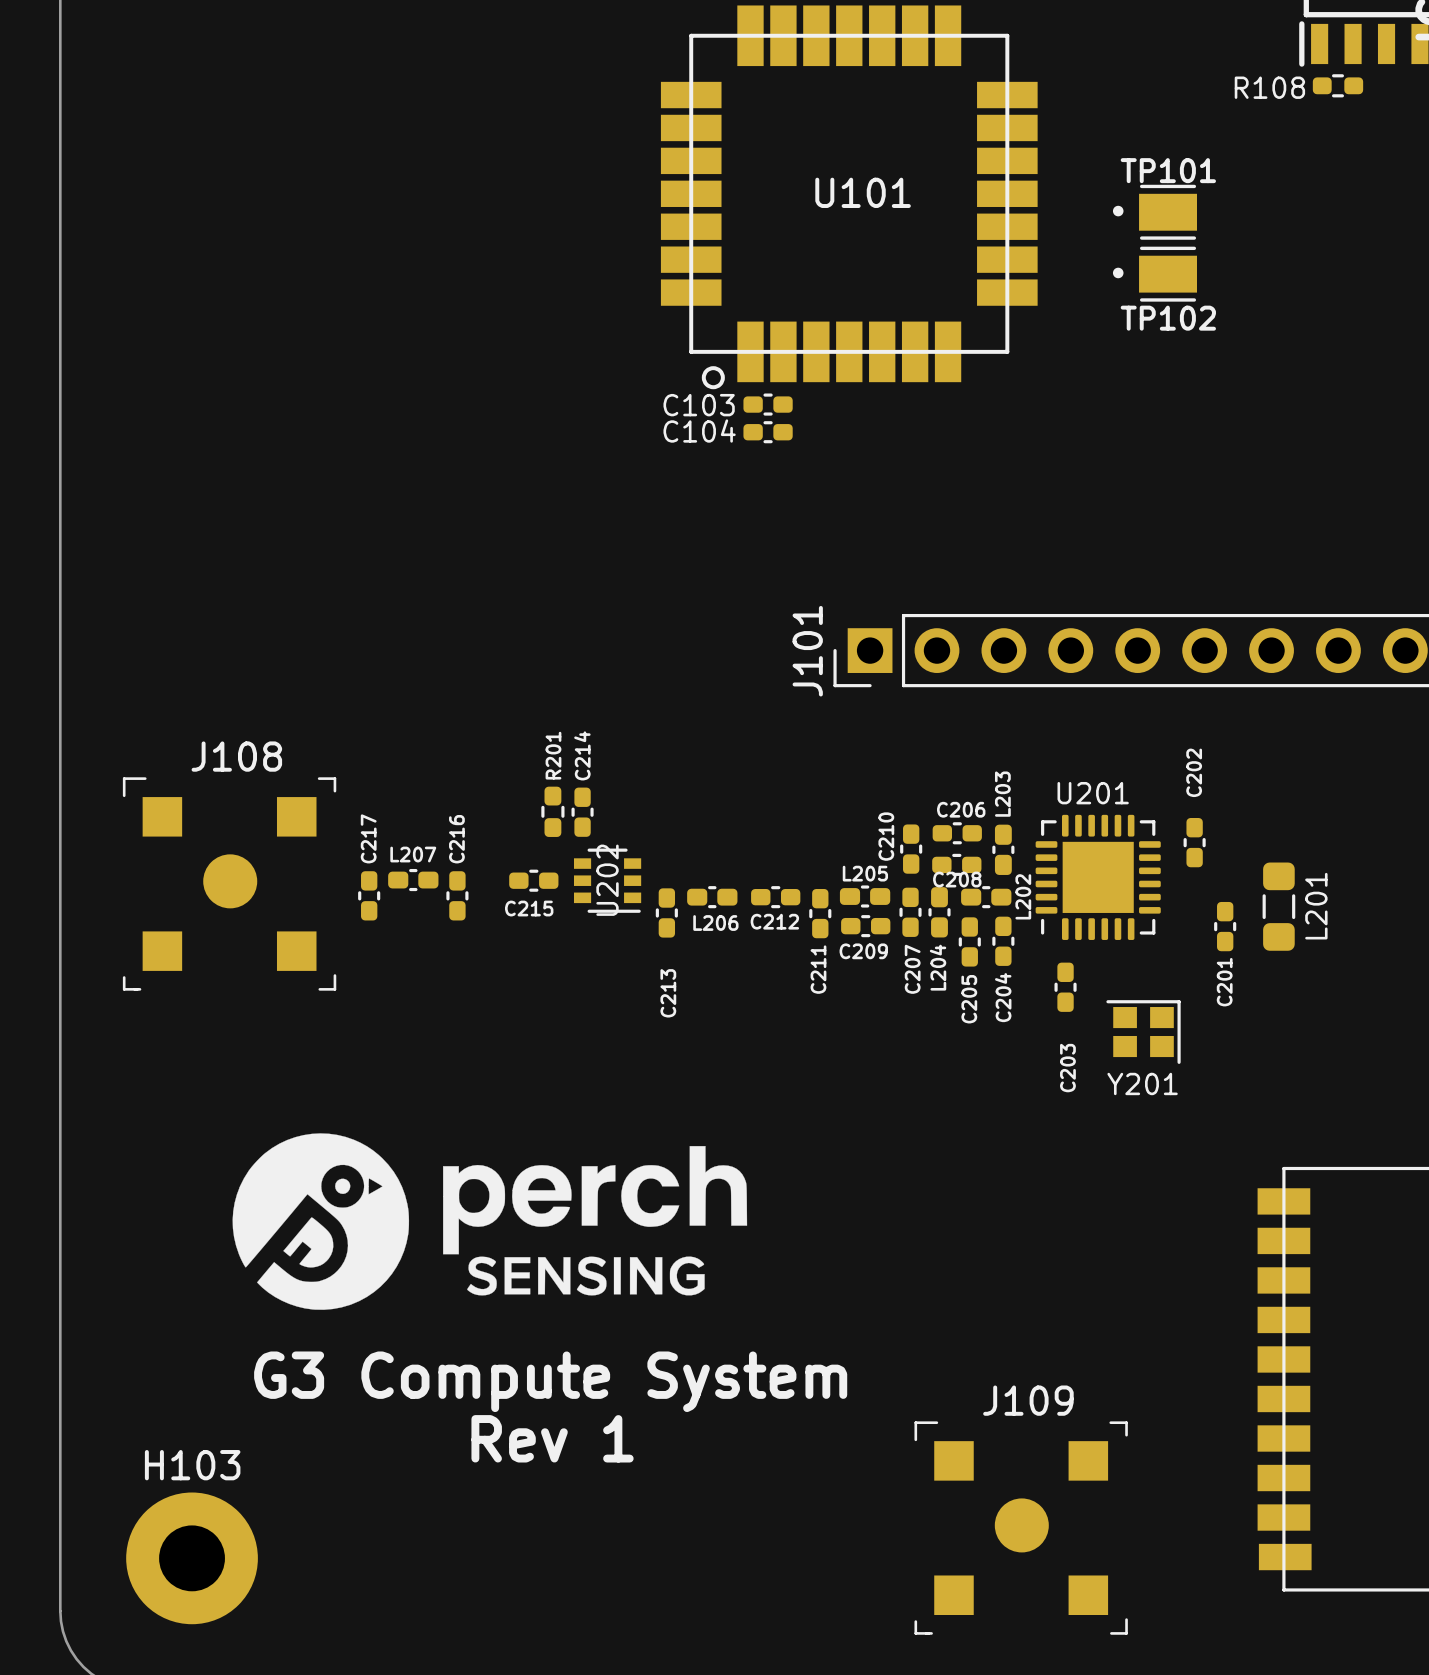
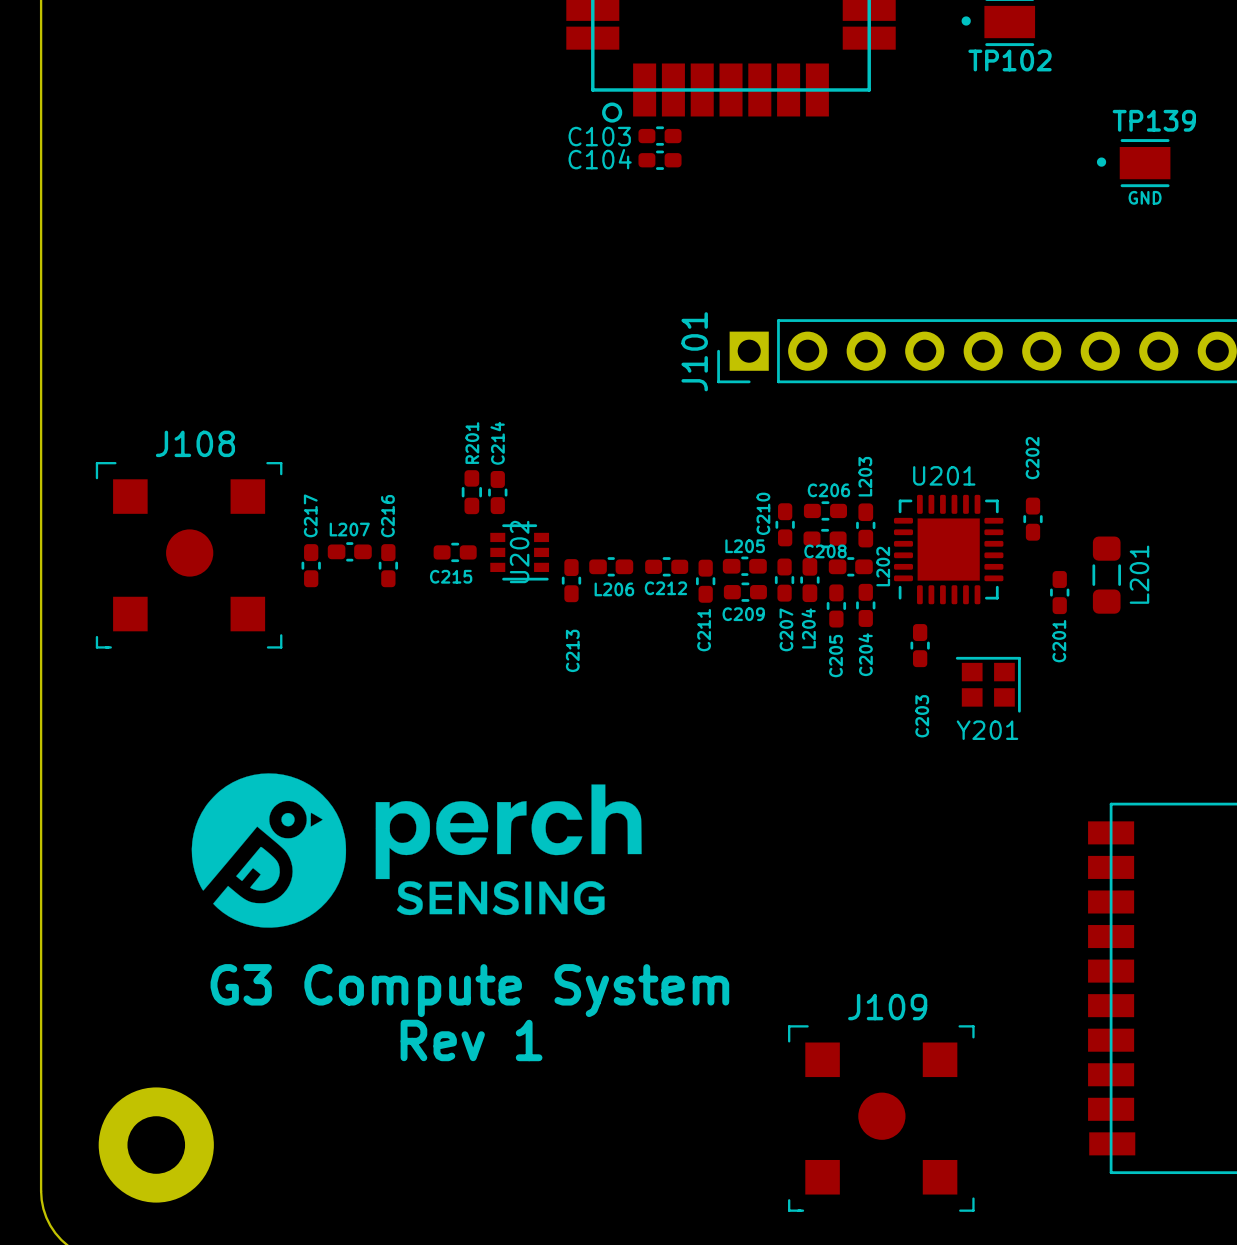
TP139: none -> (1133, 163)
text: none -> GND (1145, 197)
H103 name: H103 (192, 1465) -> none

